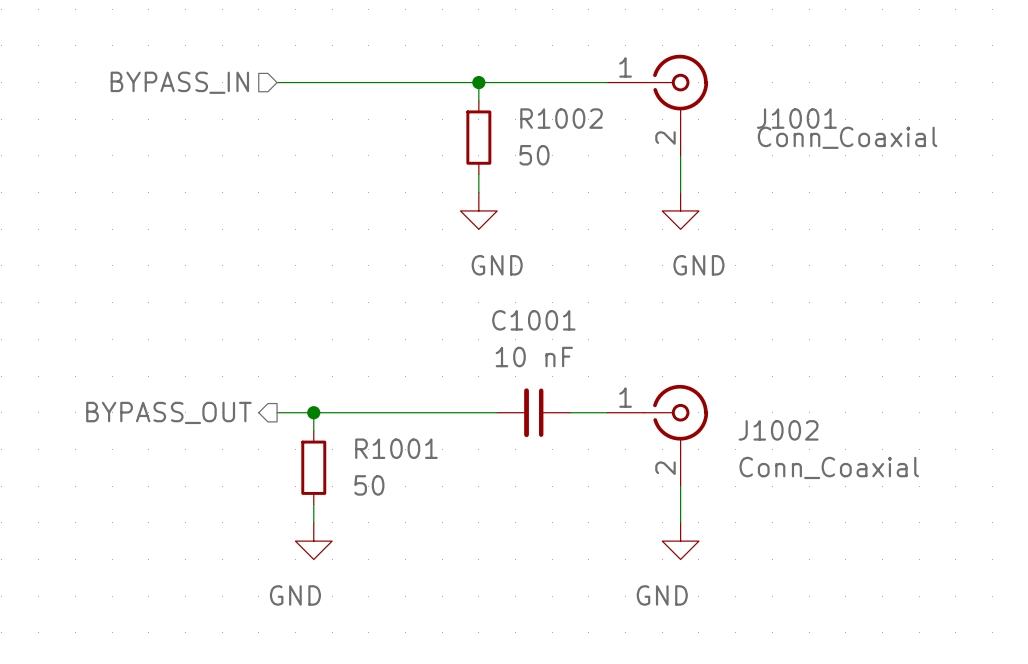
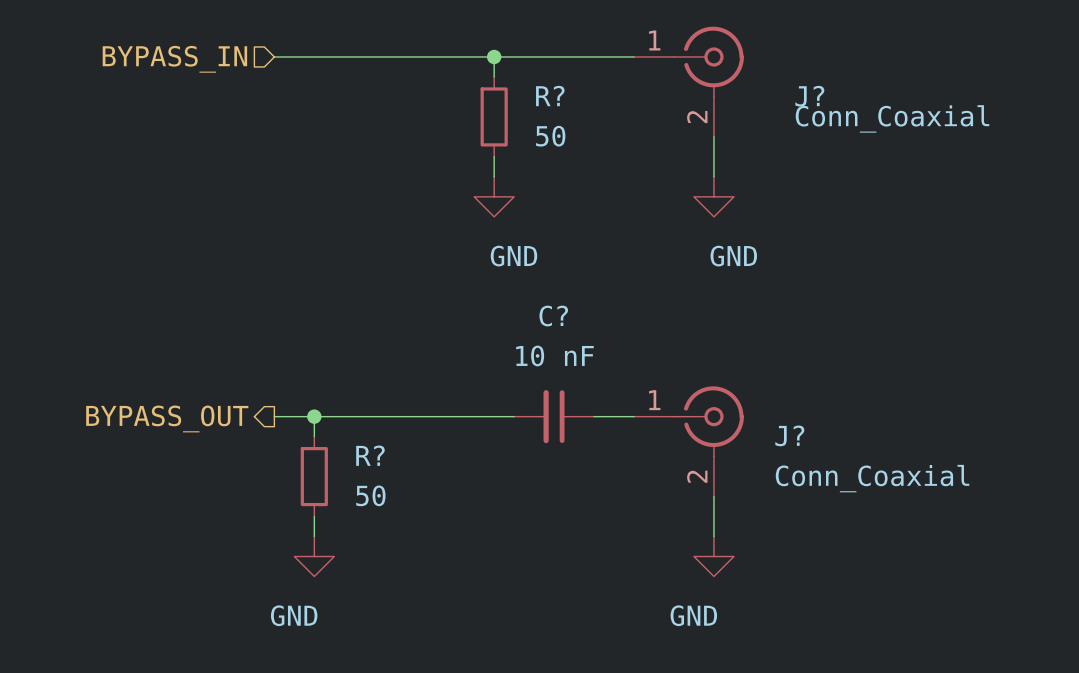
R1002 name: R1002 (561, 118) -> R? (550, 96)
J1001 name: J1001 (796, 118) -> J? (809, 96)
C1001 name: C1001 (533, 320) -> C? (553, 316)
J1002 name: J1002 (778, 430) -> J? (789, 435)
R1001 name: R1001 (396, 448) -> R? (370, 455)

